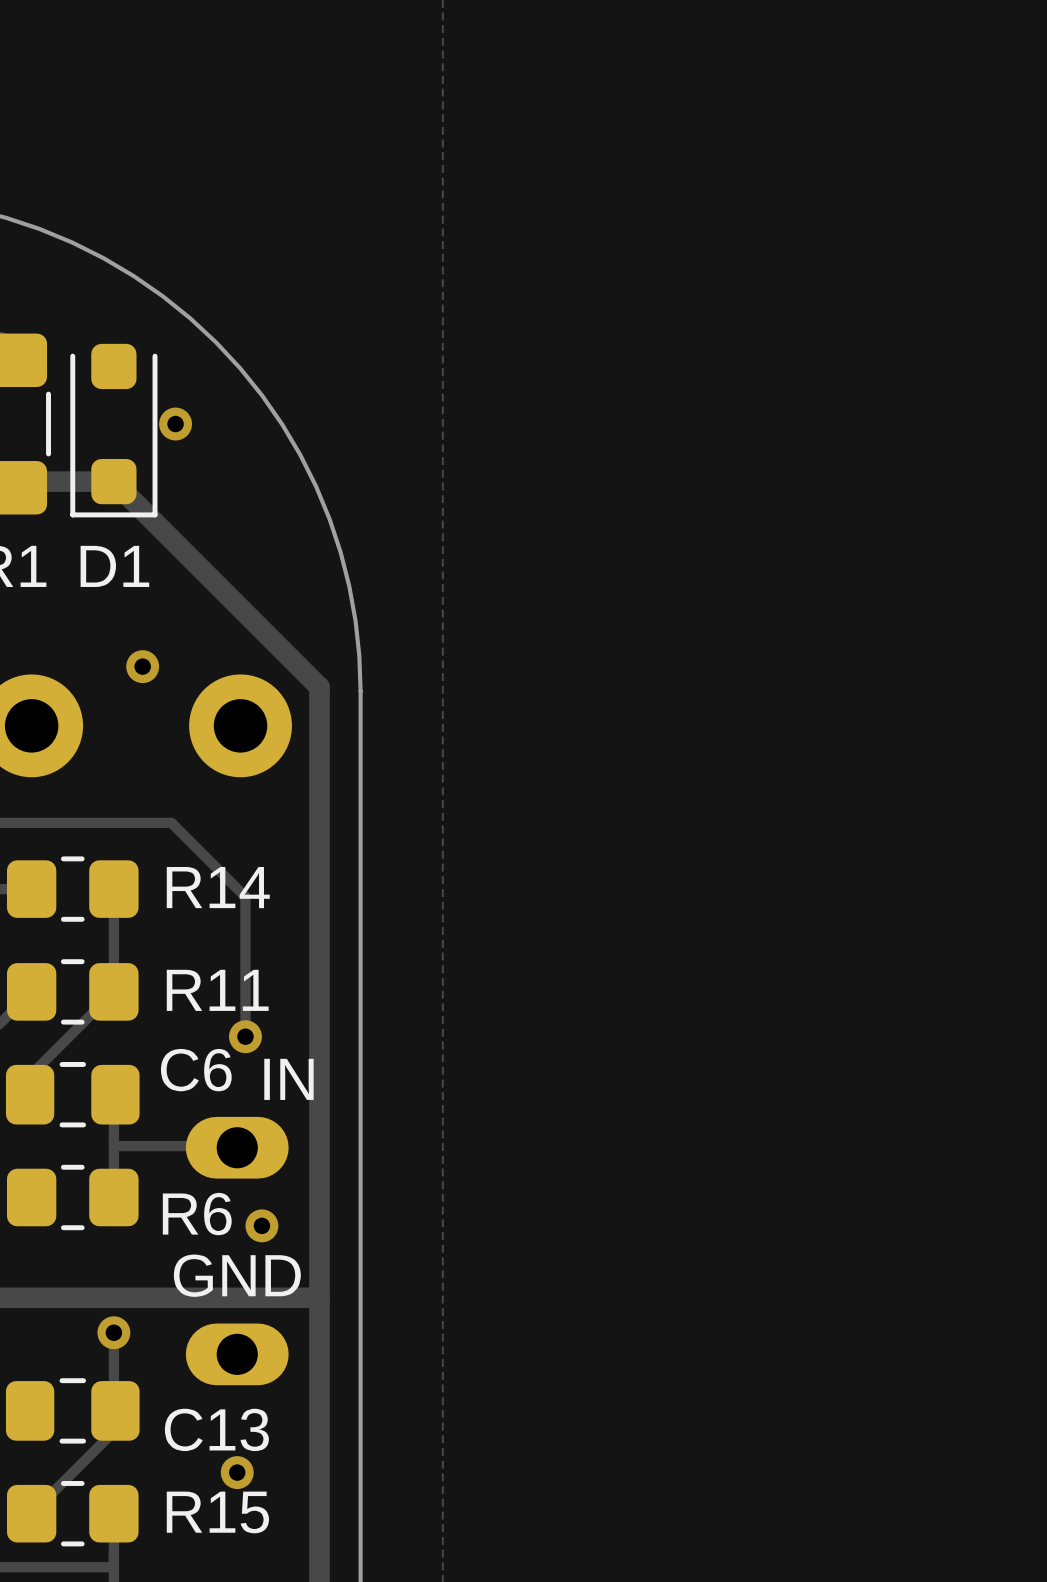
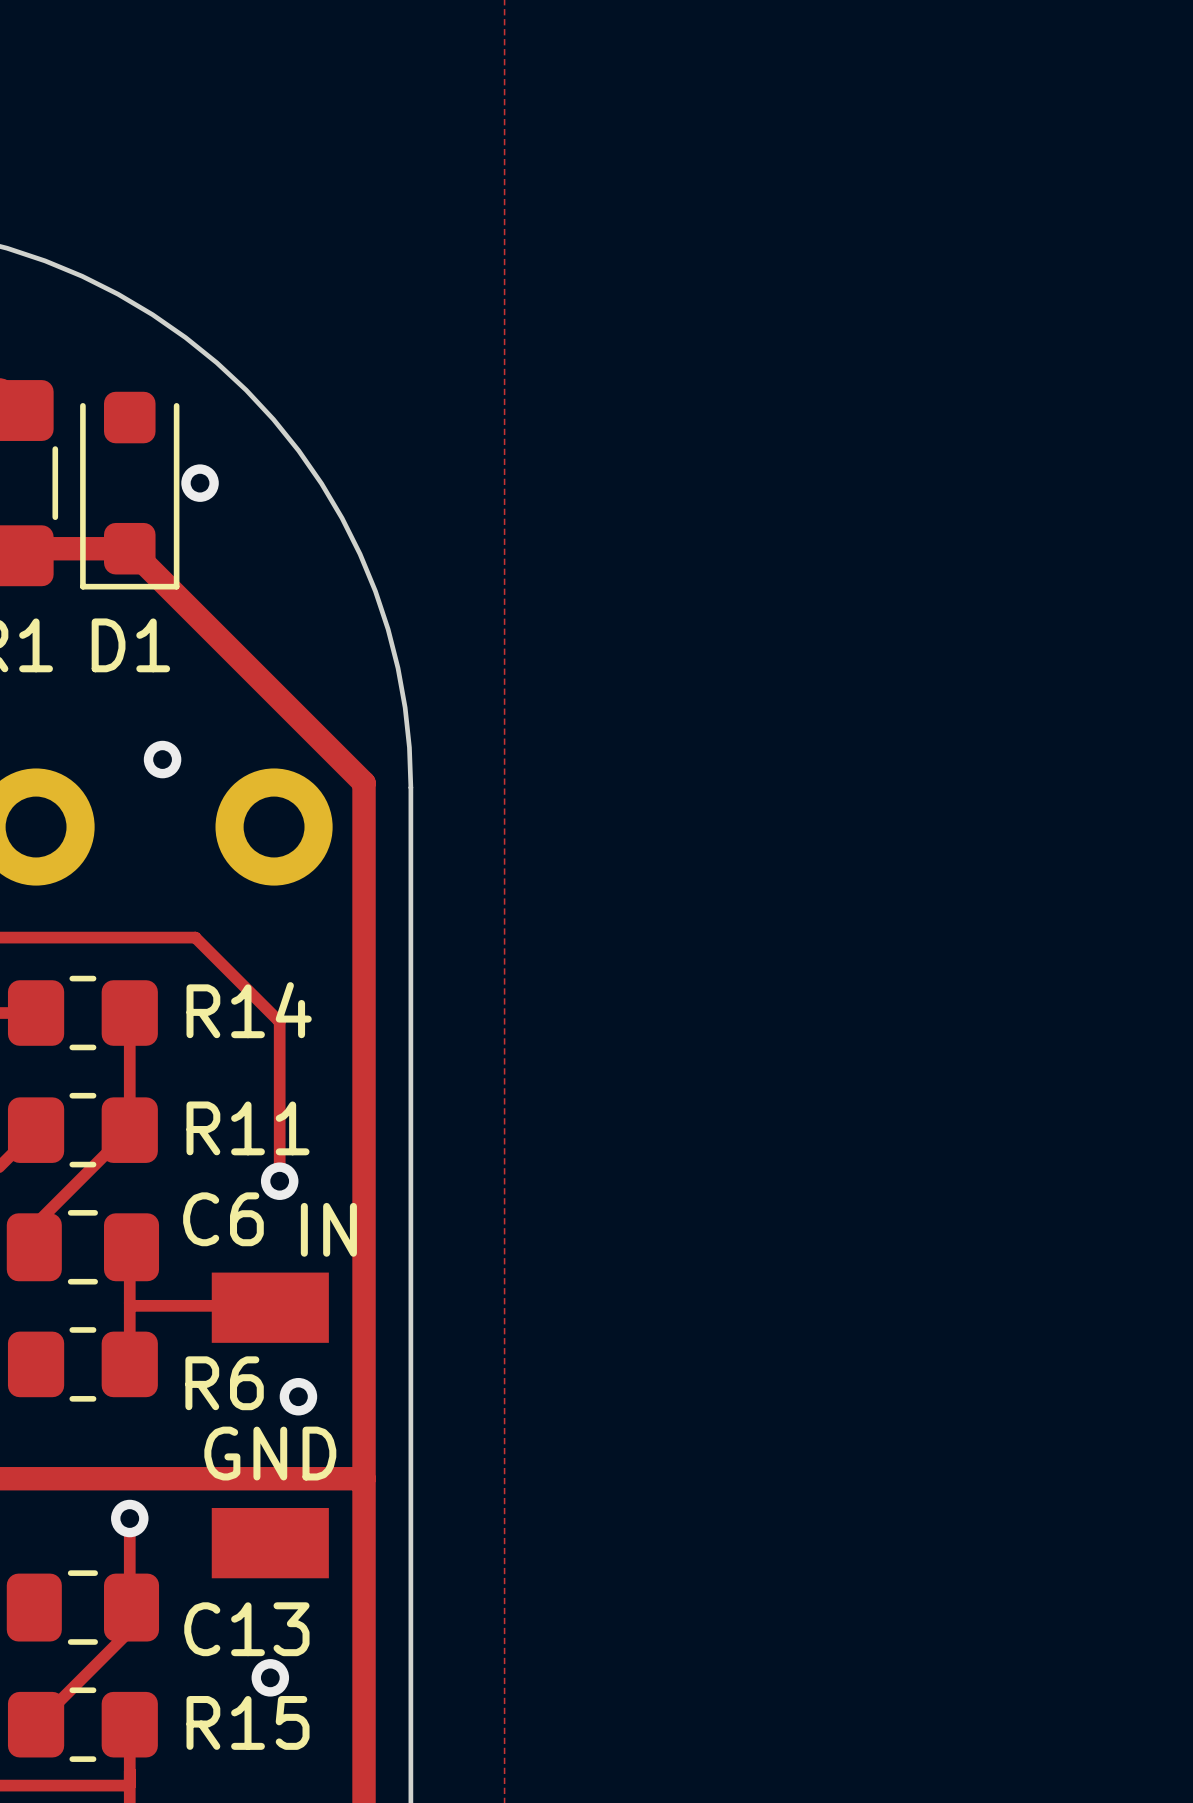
part footprint: [185, 1116, 289, 1179] -> [211, 1272, 329, 1343]
part footprint: [185, 1323, 289, 1386] -> [211, 1508, 329, 1579]

